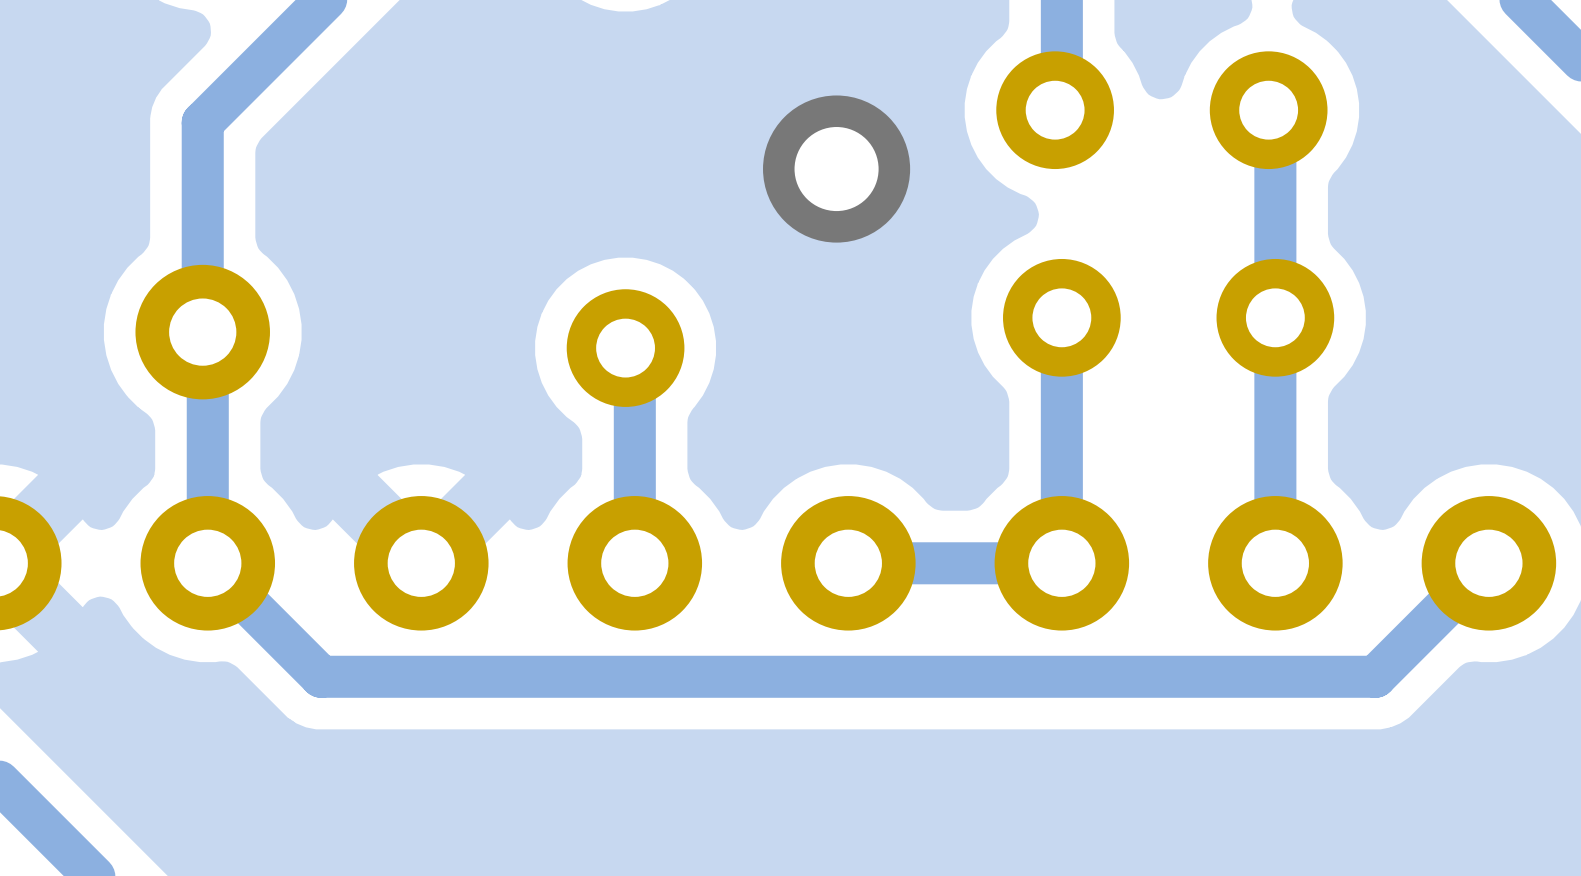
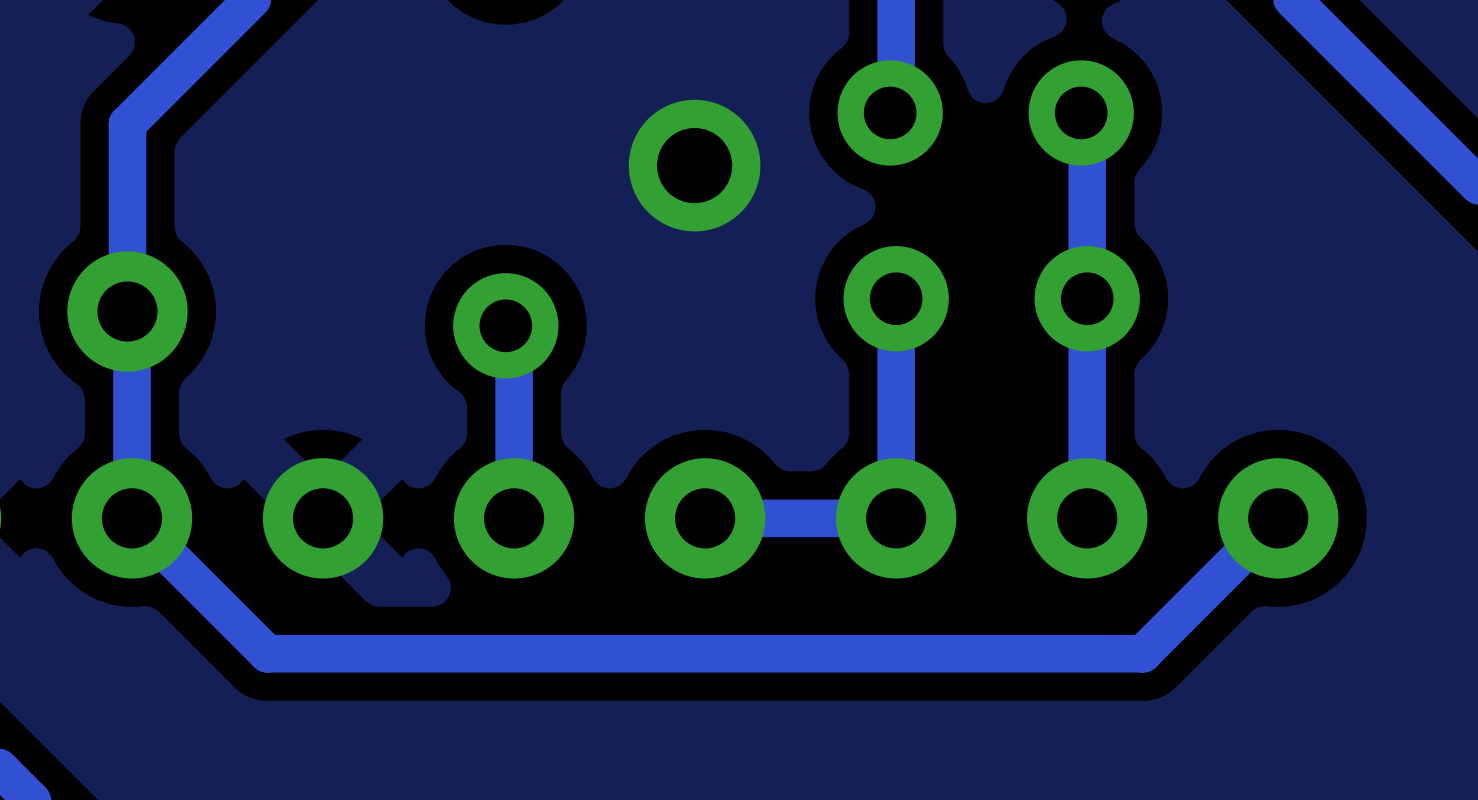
track: (1375, 676) (321, 676) -> (1176, 619) (1142, 653) (267, 653) (233, 619)

